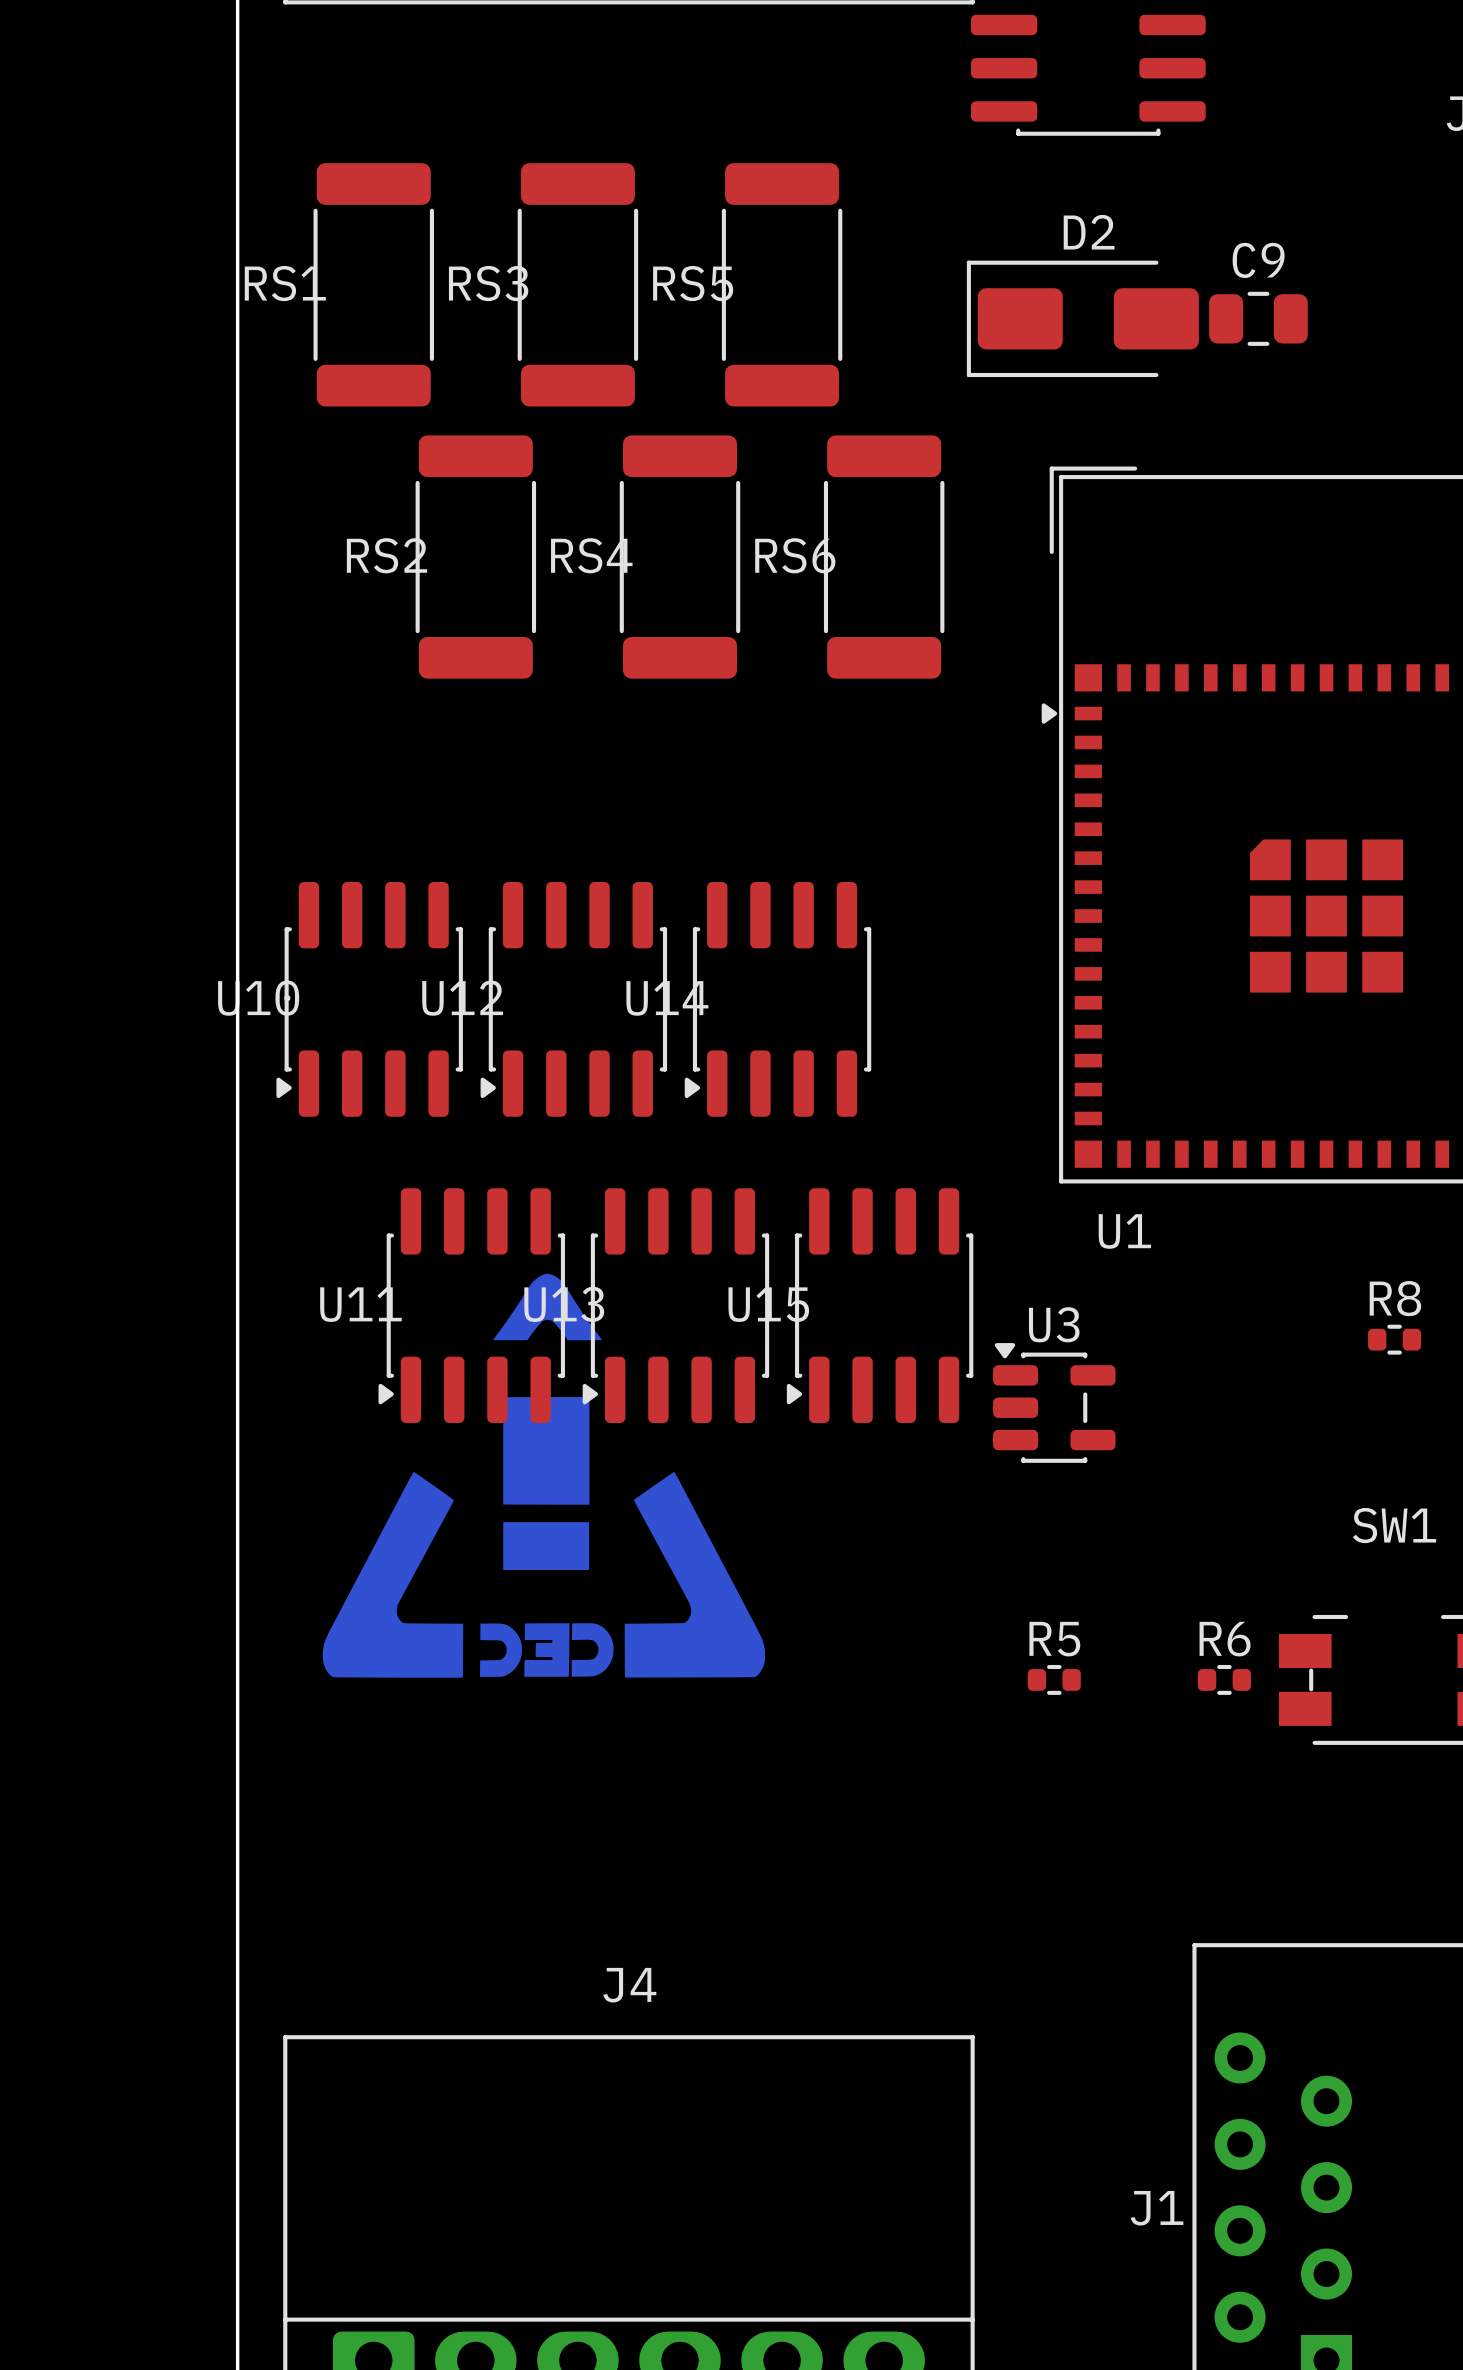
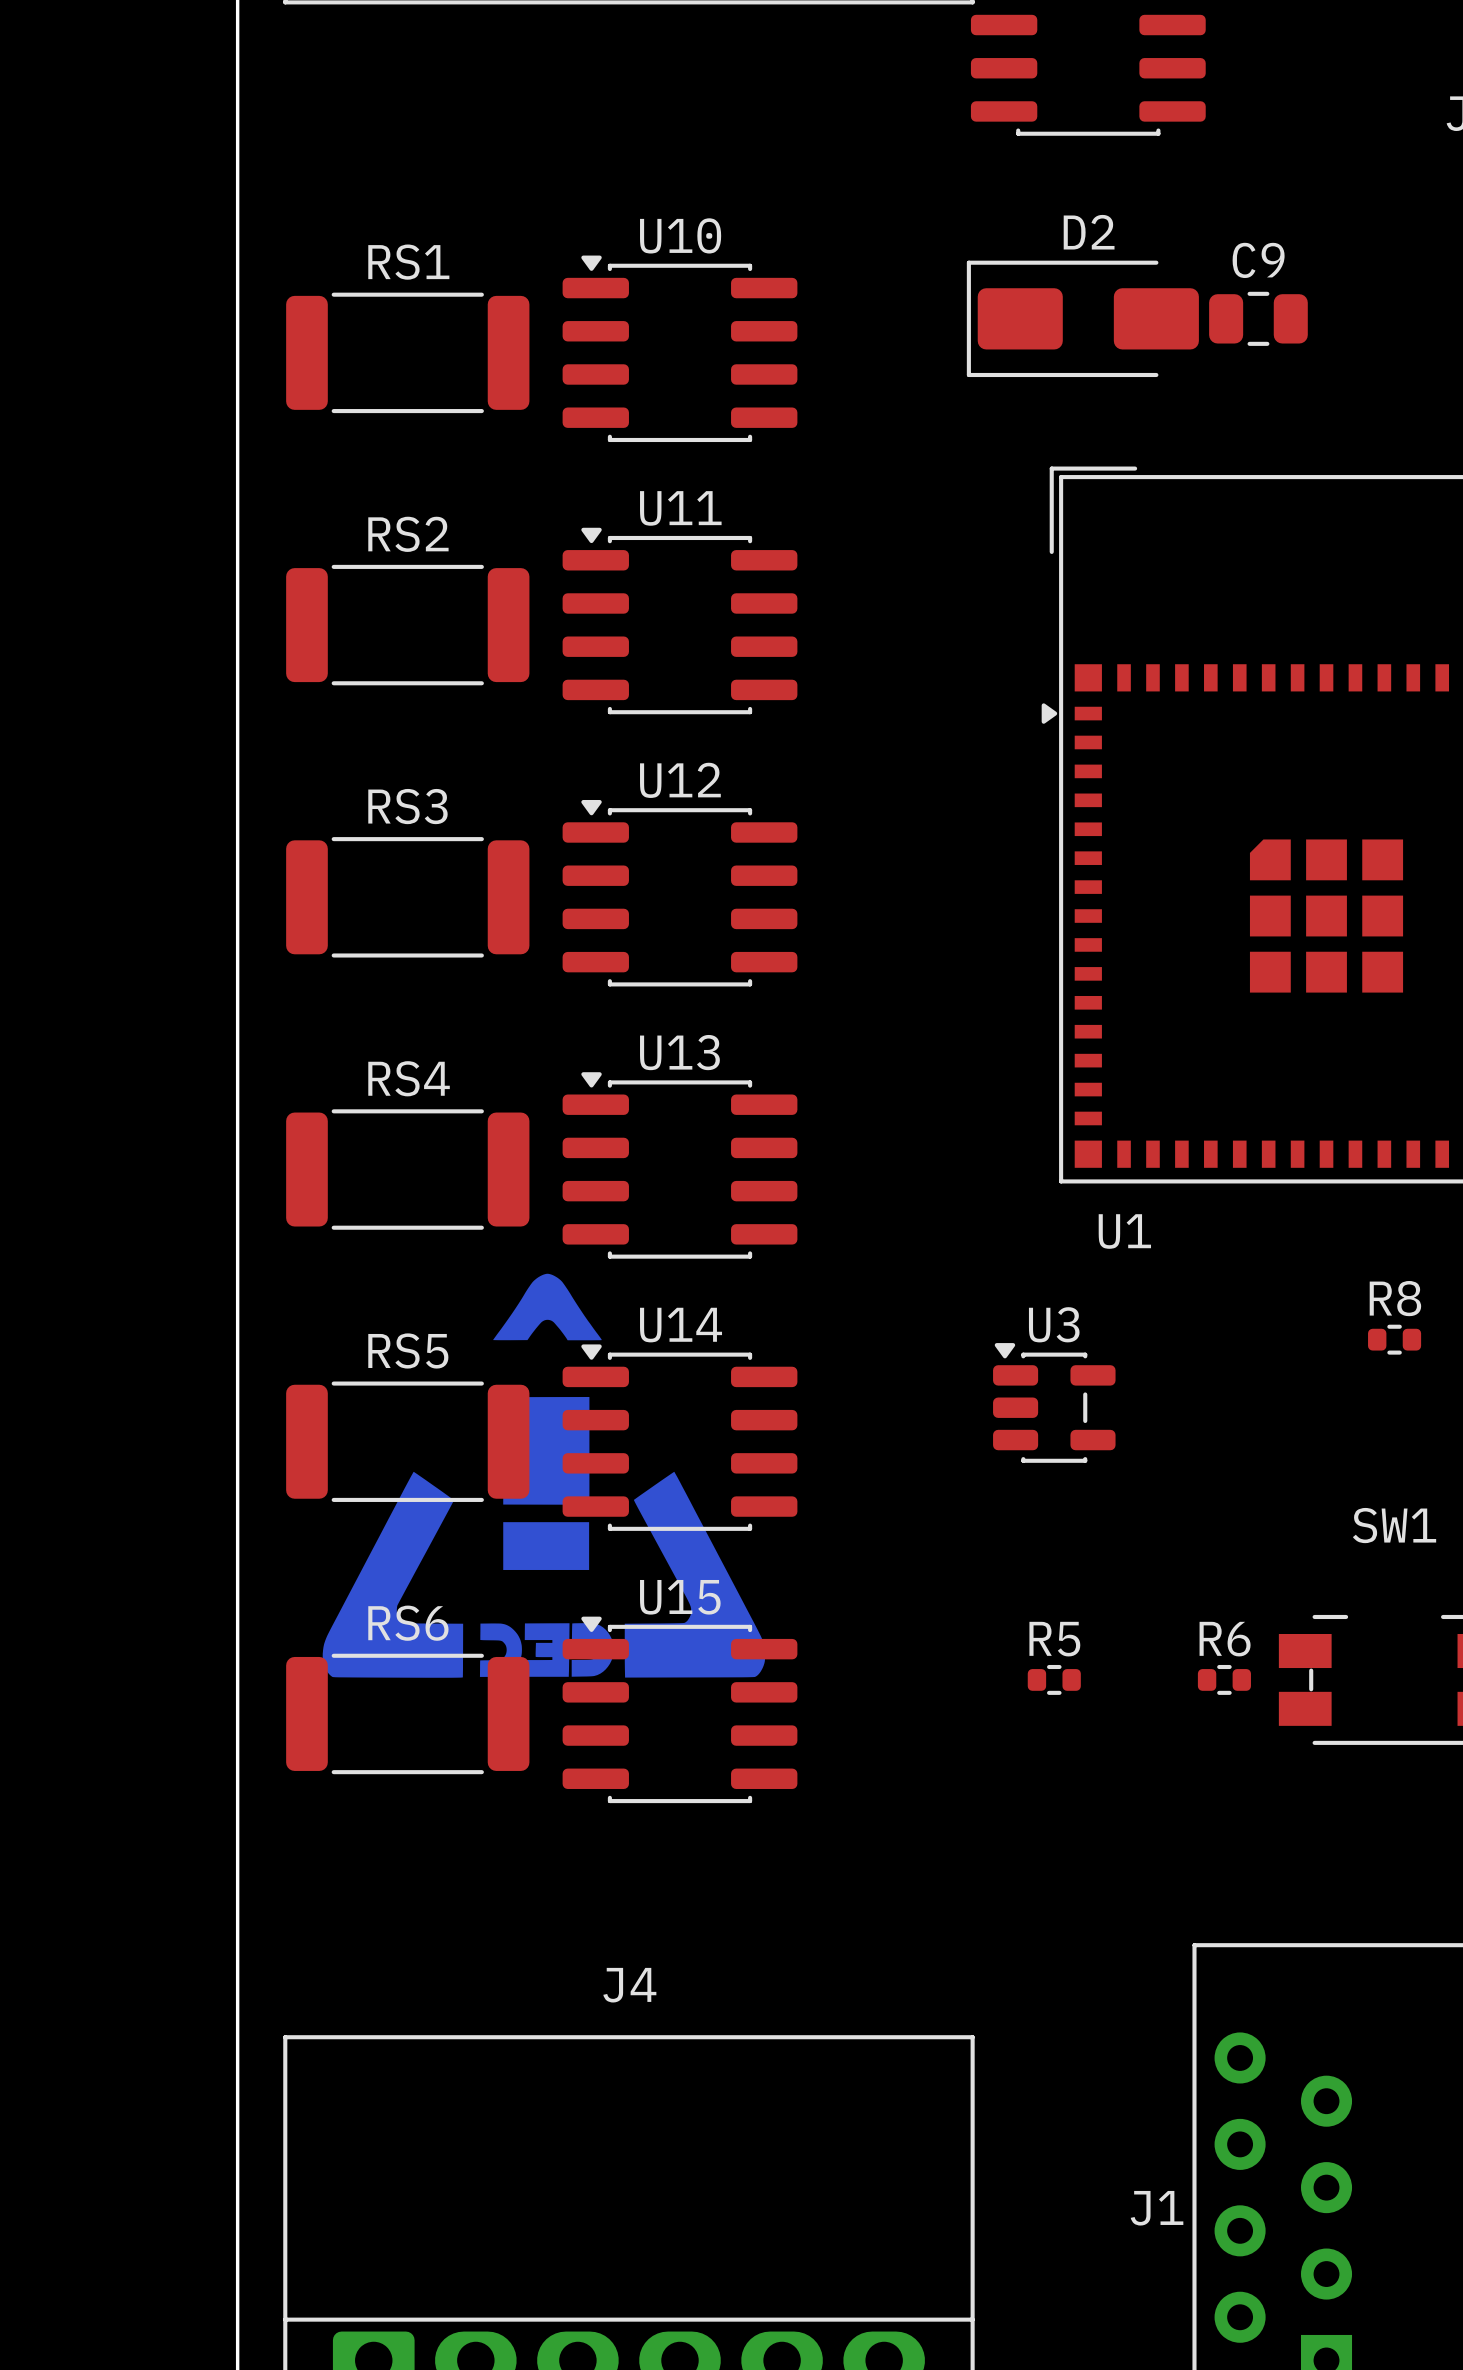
RS1 rotation: 0° (373, 284) -> 90° clockwise (407, 352)
RS3 rotation: 0° (577, 284) -> 90° clockwise (407, 897)
RS3 position: (577, 284) -> (407, 897)
RS5 rotation: 0° (782, 284) -> 90° clockwise (407, 1441)
RS5 position: (782, 284) -> (407, 1441)
RS2 rotation: 0° (475, 557) -> 90° clockwise (407, 625)
RS4 rotation: 0° (680, 557) -> 90° clockwise (407, 1169)
RS4 position: (680, 557) -> (407, 1169)
RS6 rotation: 0° (884, 557) -> 90° clockwise (407, 1713)
RS6 position: (884, 557) -> (407, 1713)
U10 rotation: 0° (369, 999) -> 90° clockwise (680, 348)
U10 position: (369, 999) -> (680, 348)
U12 rotation: 0° (573, 999) -> 90° clockwise (680, 893)
U12 position: (573, 999) -> (680, 893)
U14 rotation: 0° (777, 999) -> 90° clockwise (680, 1437)
U14 position: (777, 999) -> (680, 1437)
U11 rotation: 0° (471, 1305) -> 90° clockwise (680, 621)
U11 position: (471, 1305) -> (680, 621)
U13 rotation: 0° (675, 1305) -> 90° clockwise (680, 1165)
U15 rotation: 0° (880, 1305) -> 90° clockwise (680, 1709)
U15 position: (880, 1305) -> (680, 1709)

